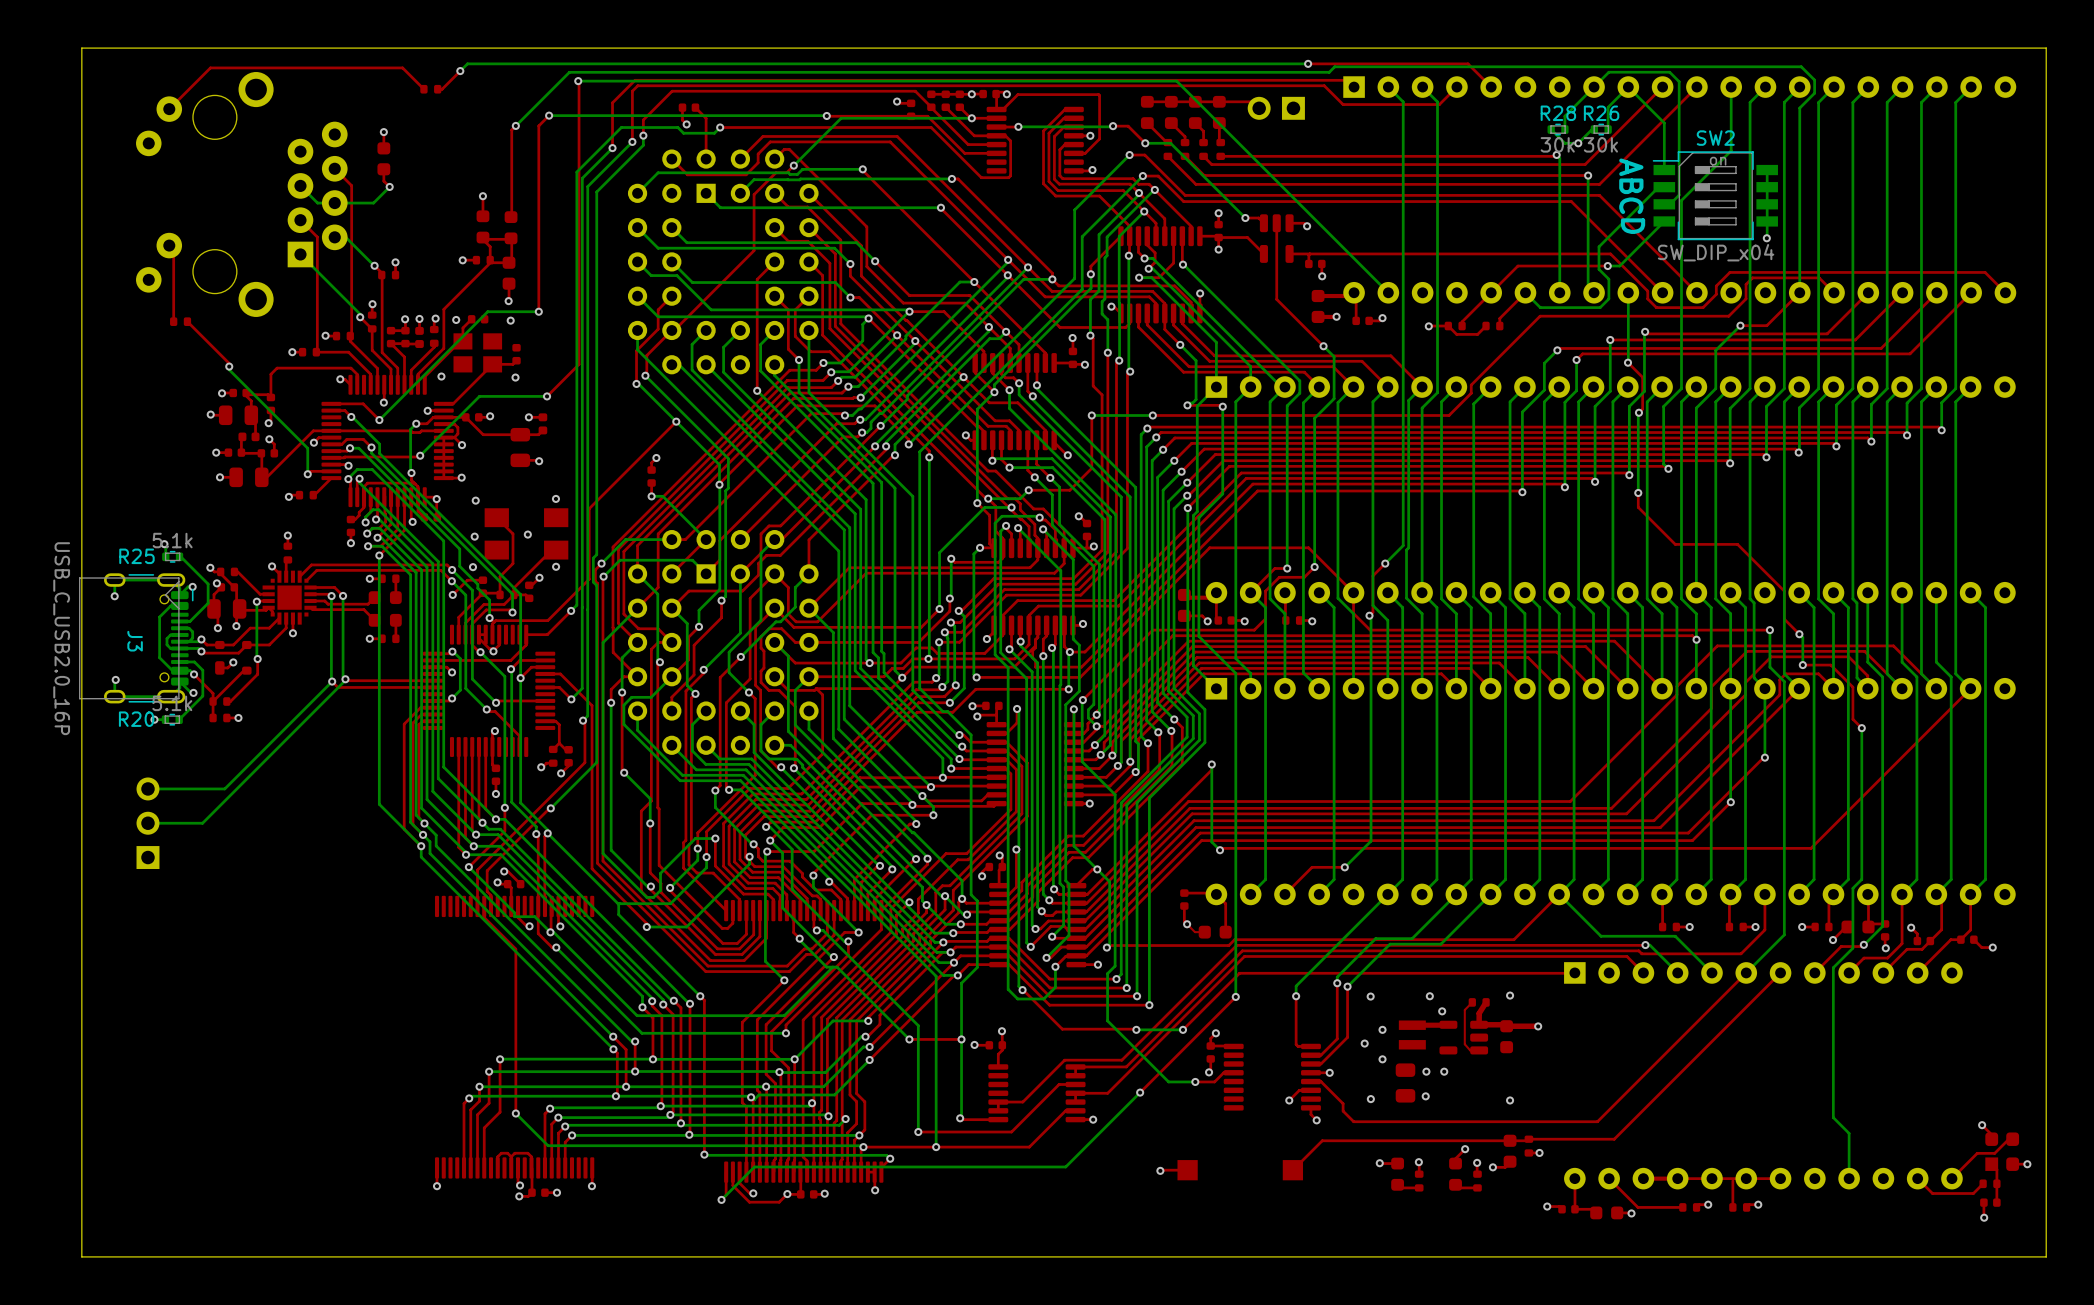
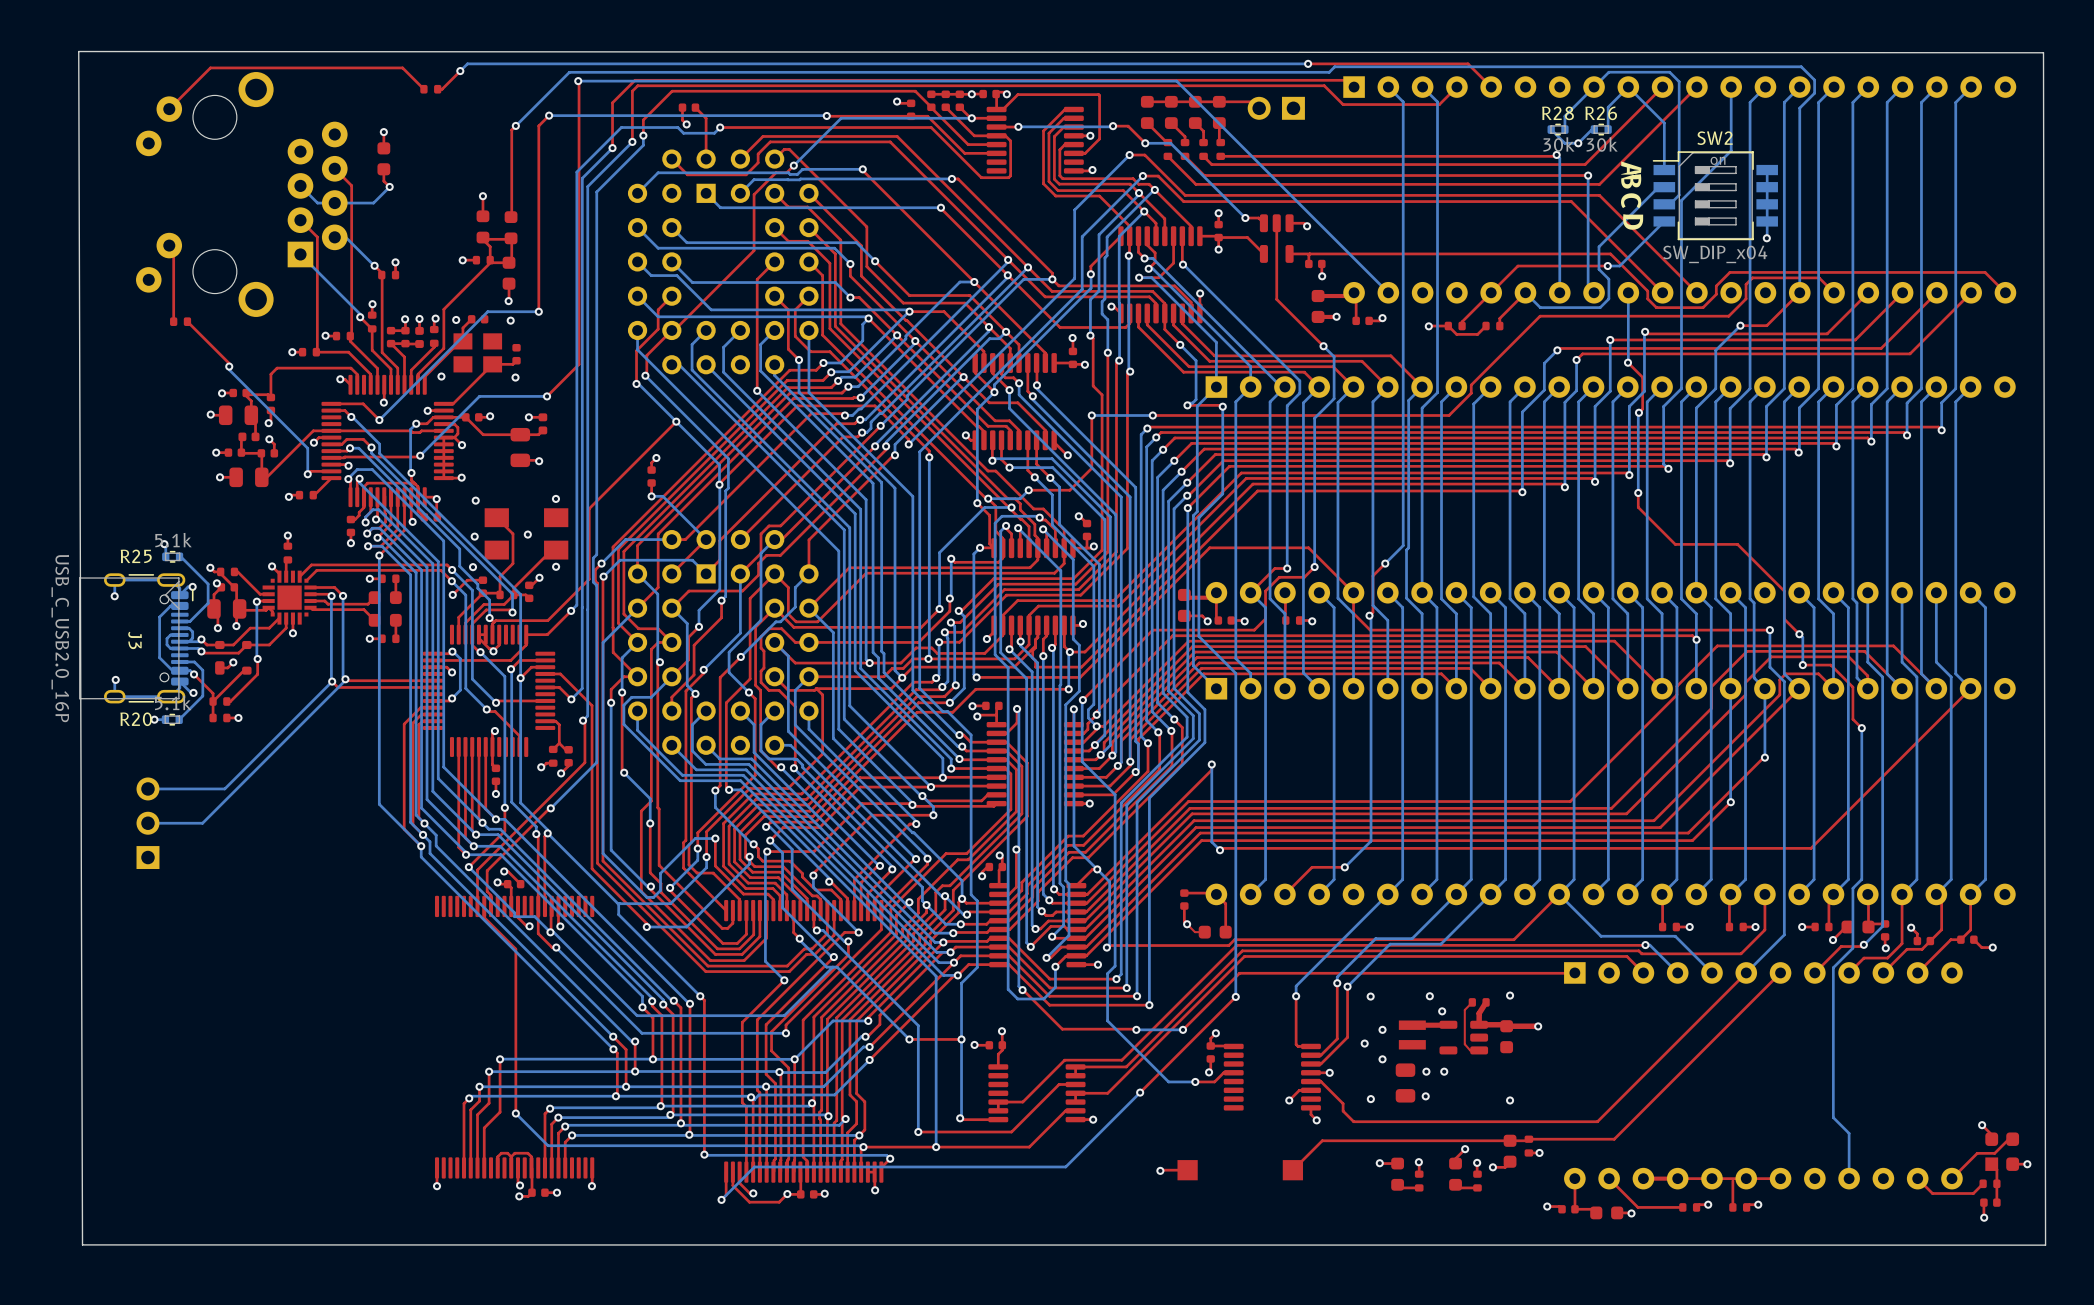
board edge: (2046, 48) (81, 48) (81, 1256) (2046, 1256) (2046, 48) -> (78, 51) (2043, 52) (2045, 1245) (82, 1244) (78, 51)

